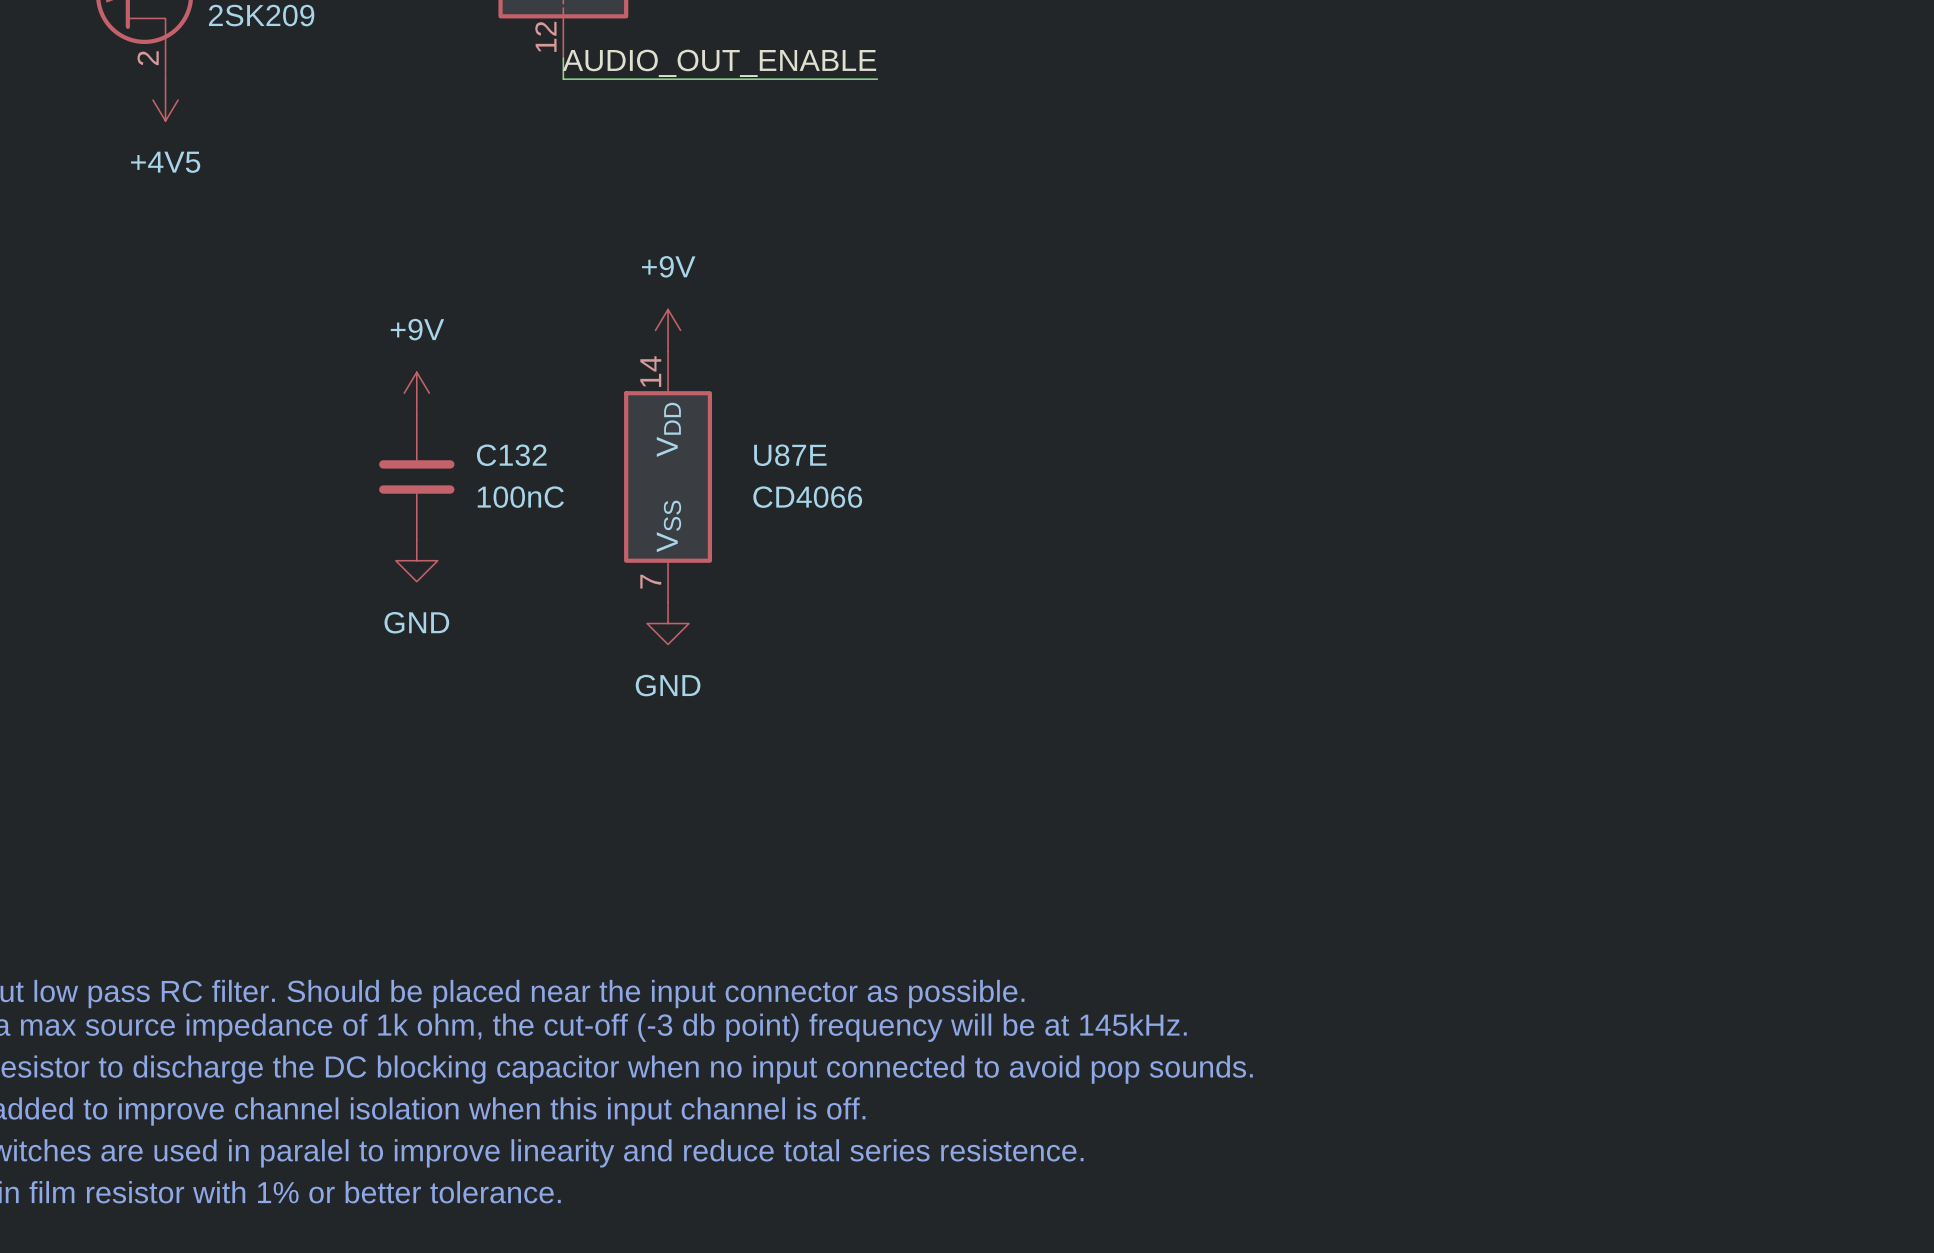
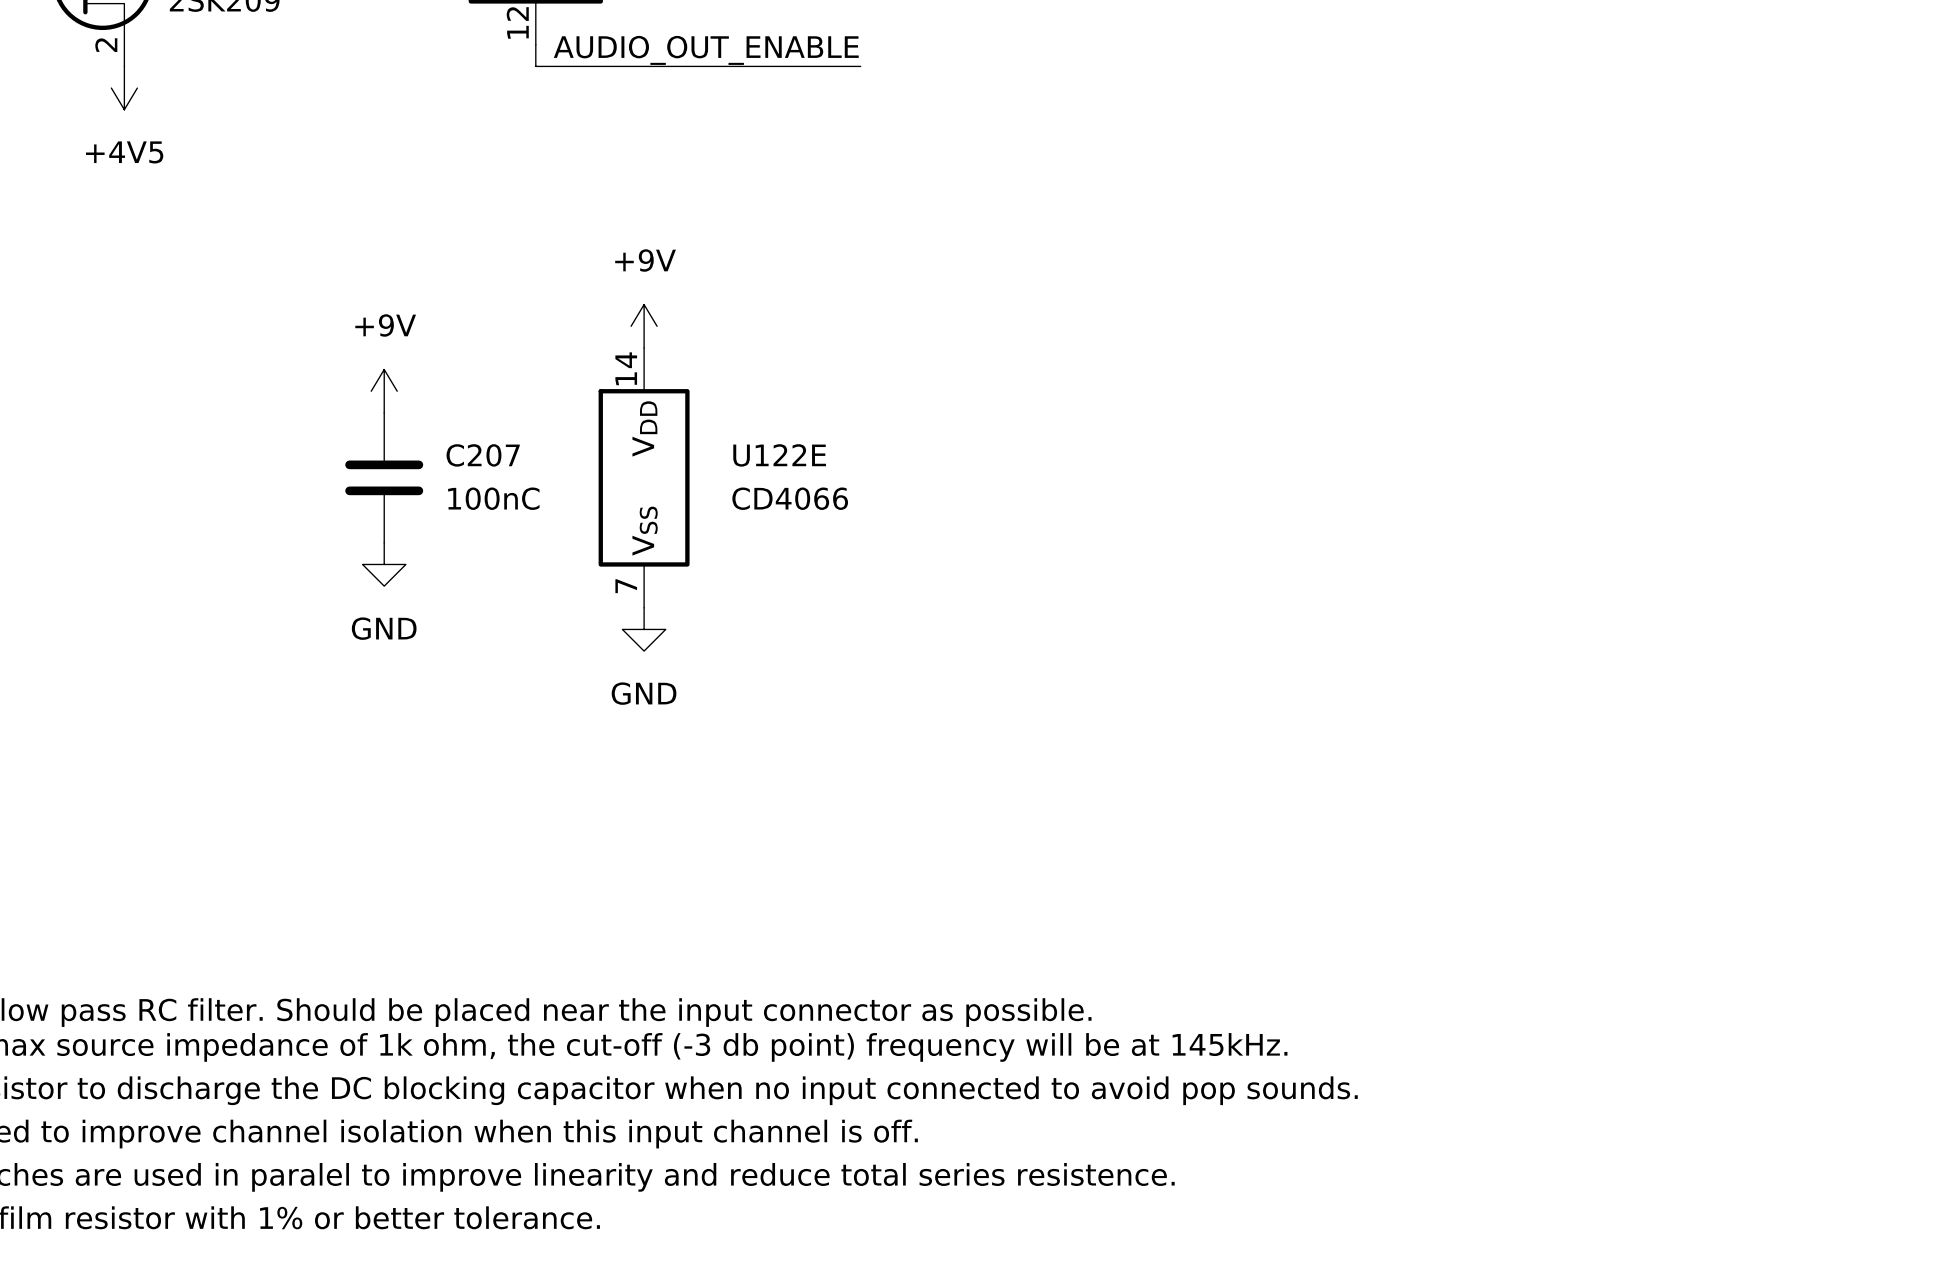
C132 name: C132 (511, 455) -> C207 (483, 455)
U87E name: U87E (790, 455) -> U122E (779, 455)

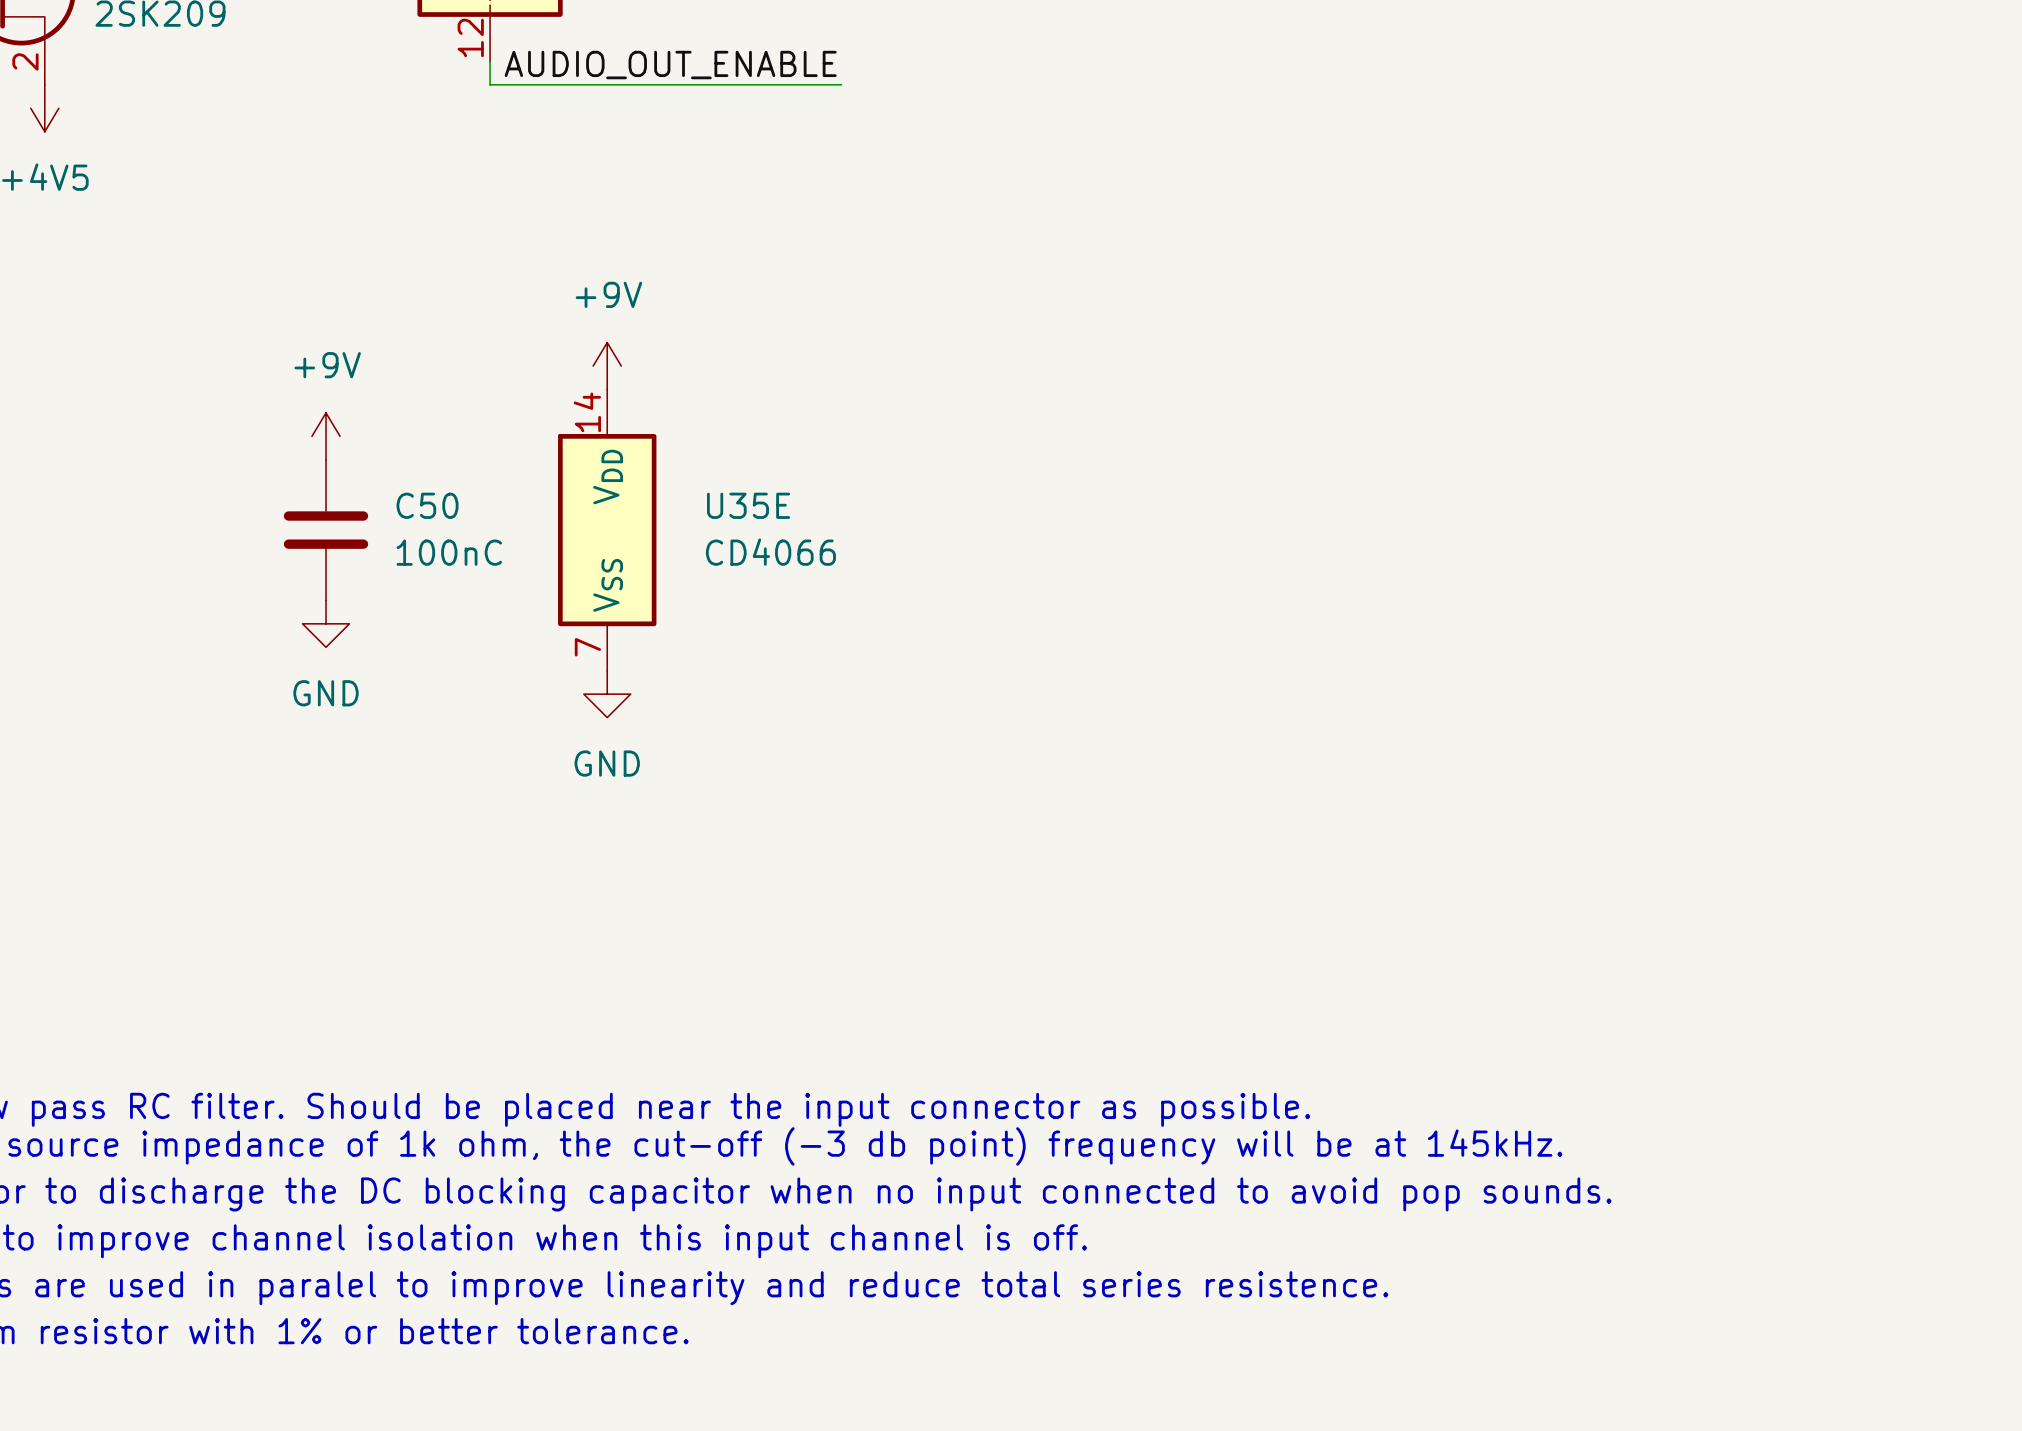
C207 name: C207 (483, 455) -> C50 (427, 505)
U122E name: U122E (779, 455) -> U35E (748, 505)

